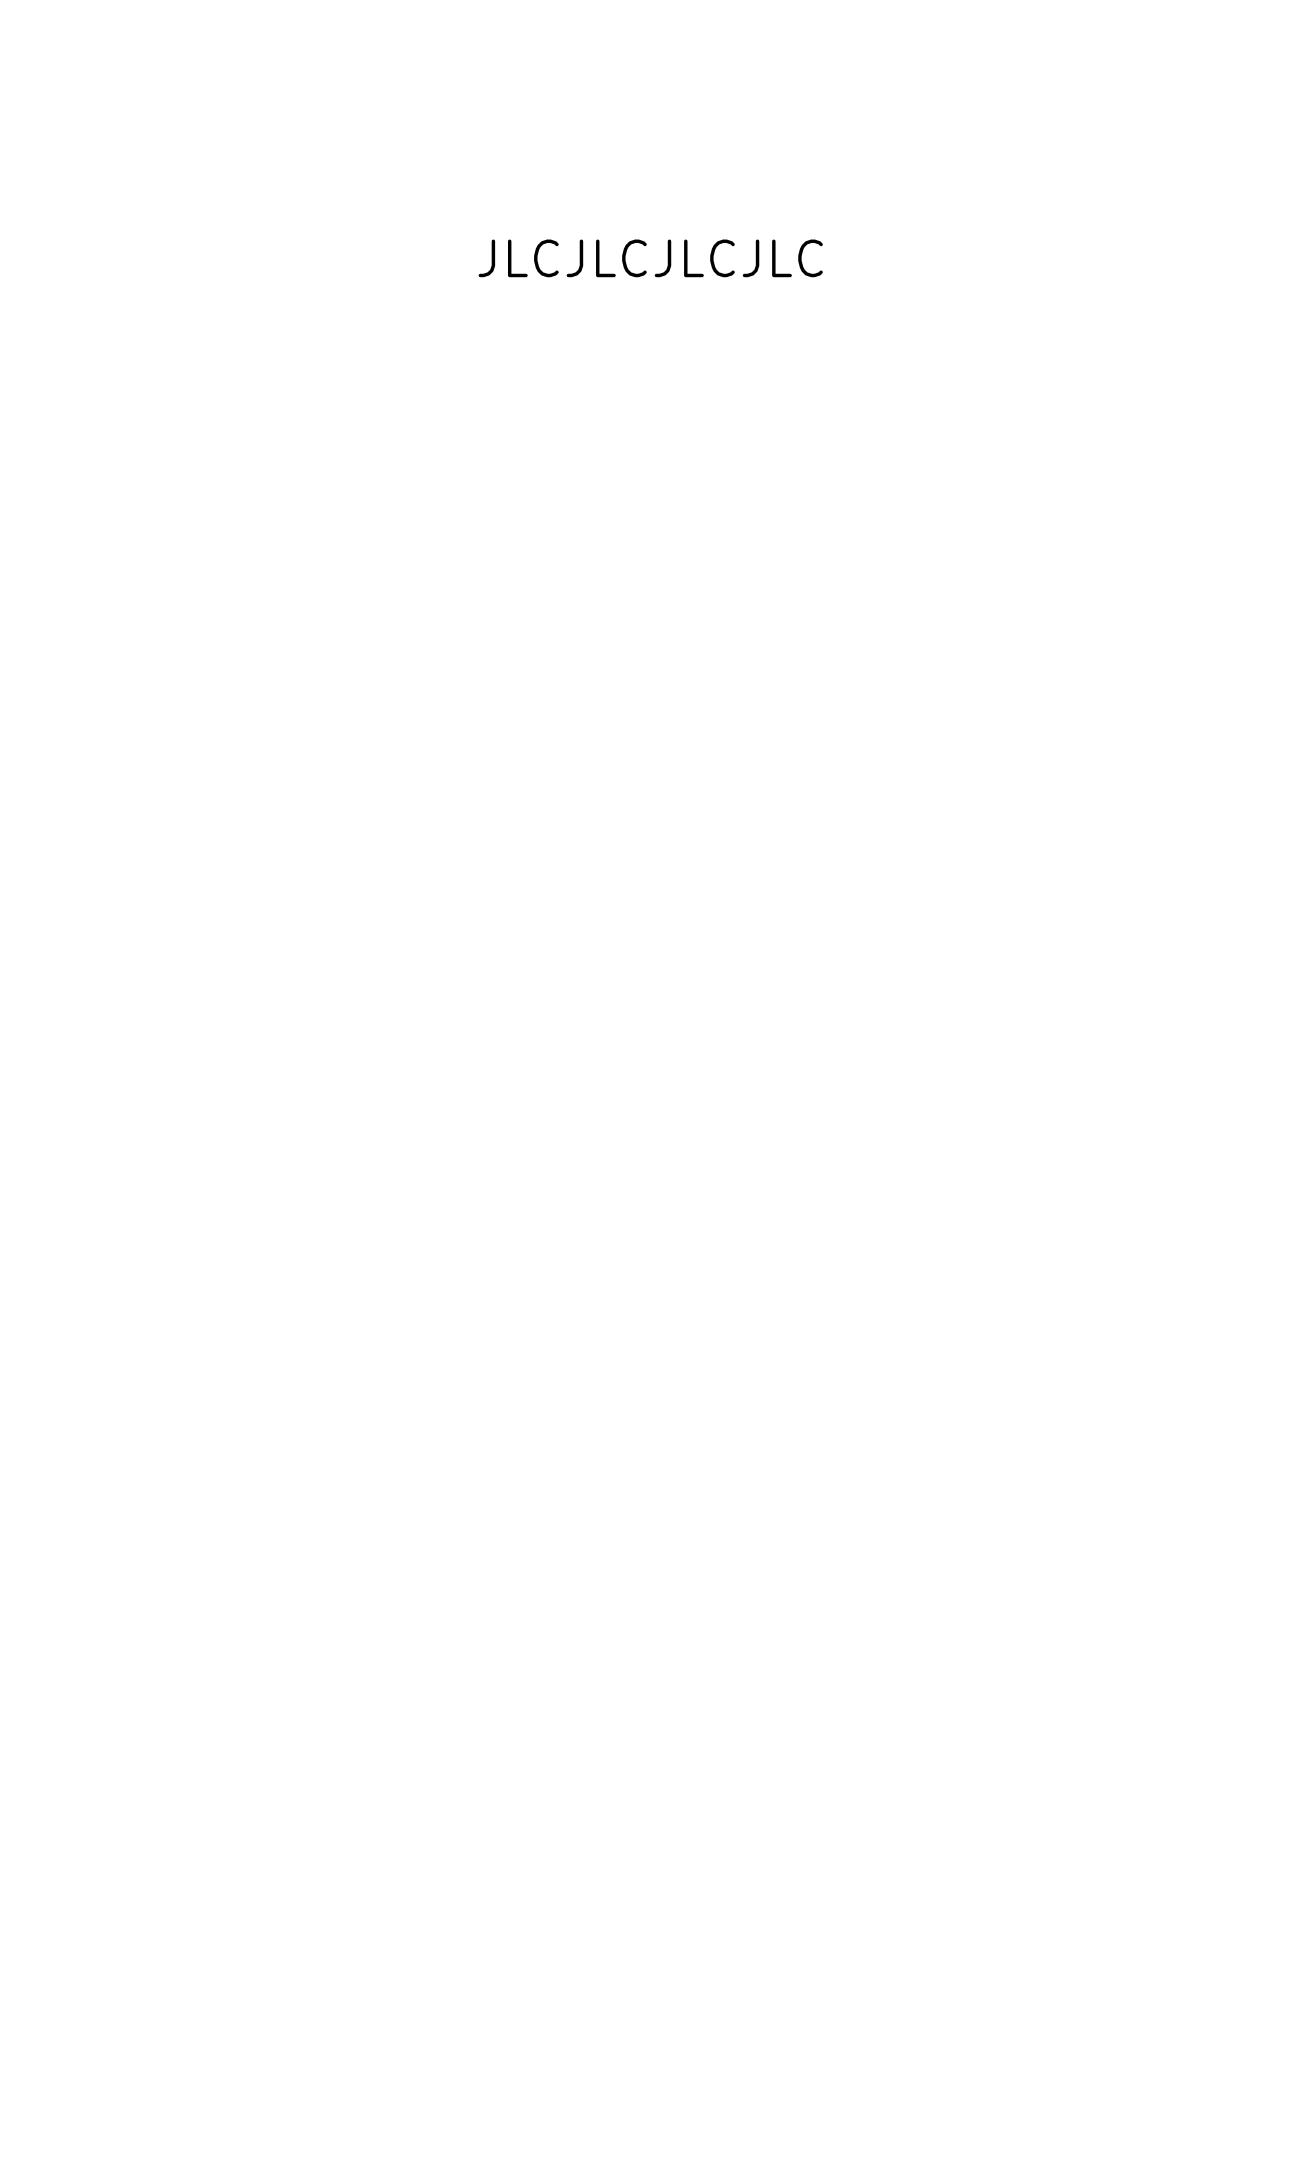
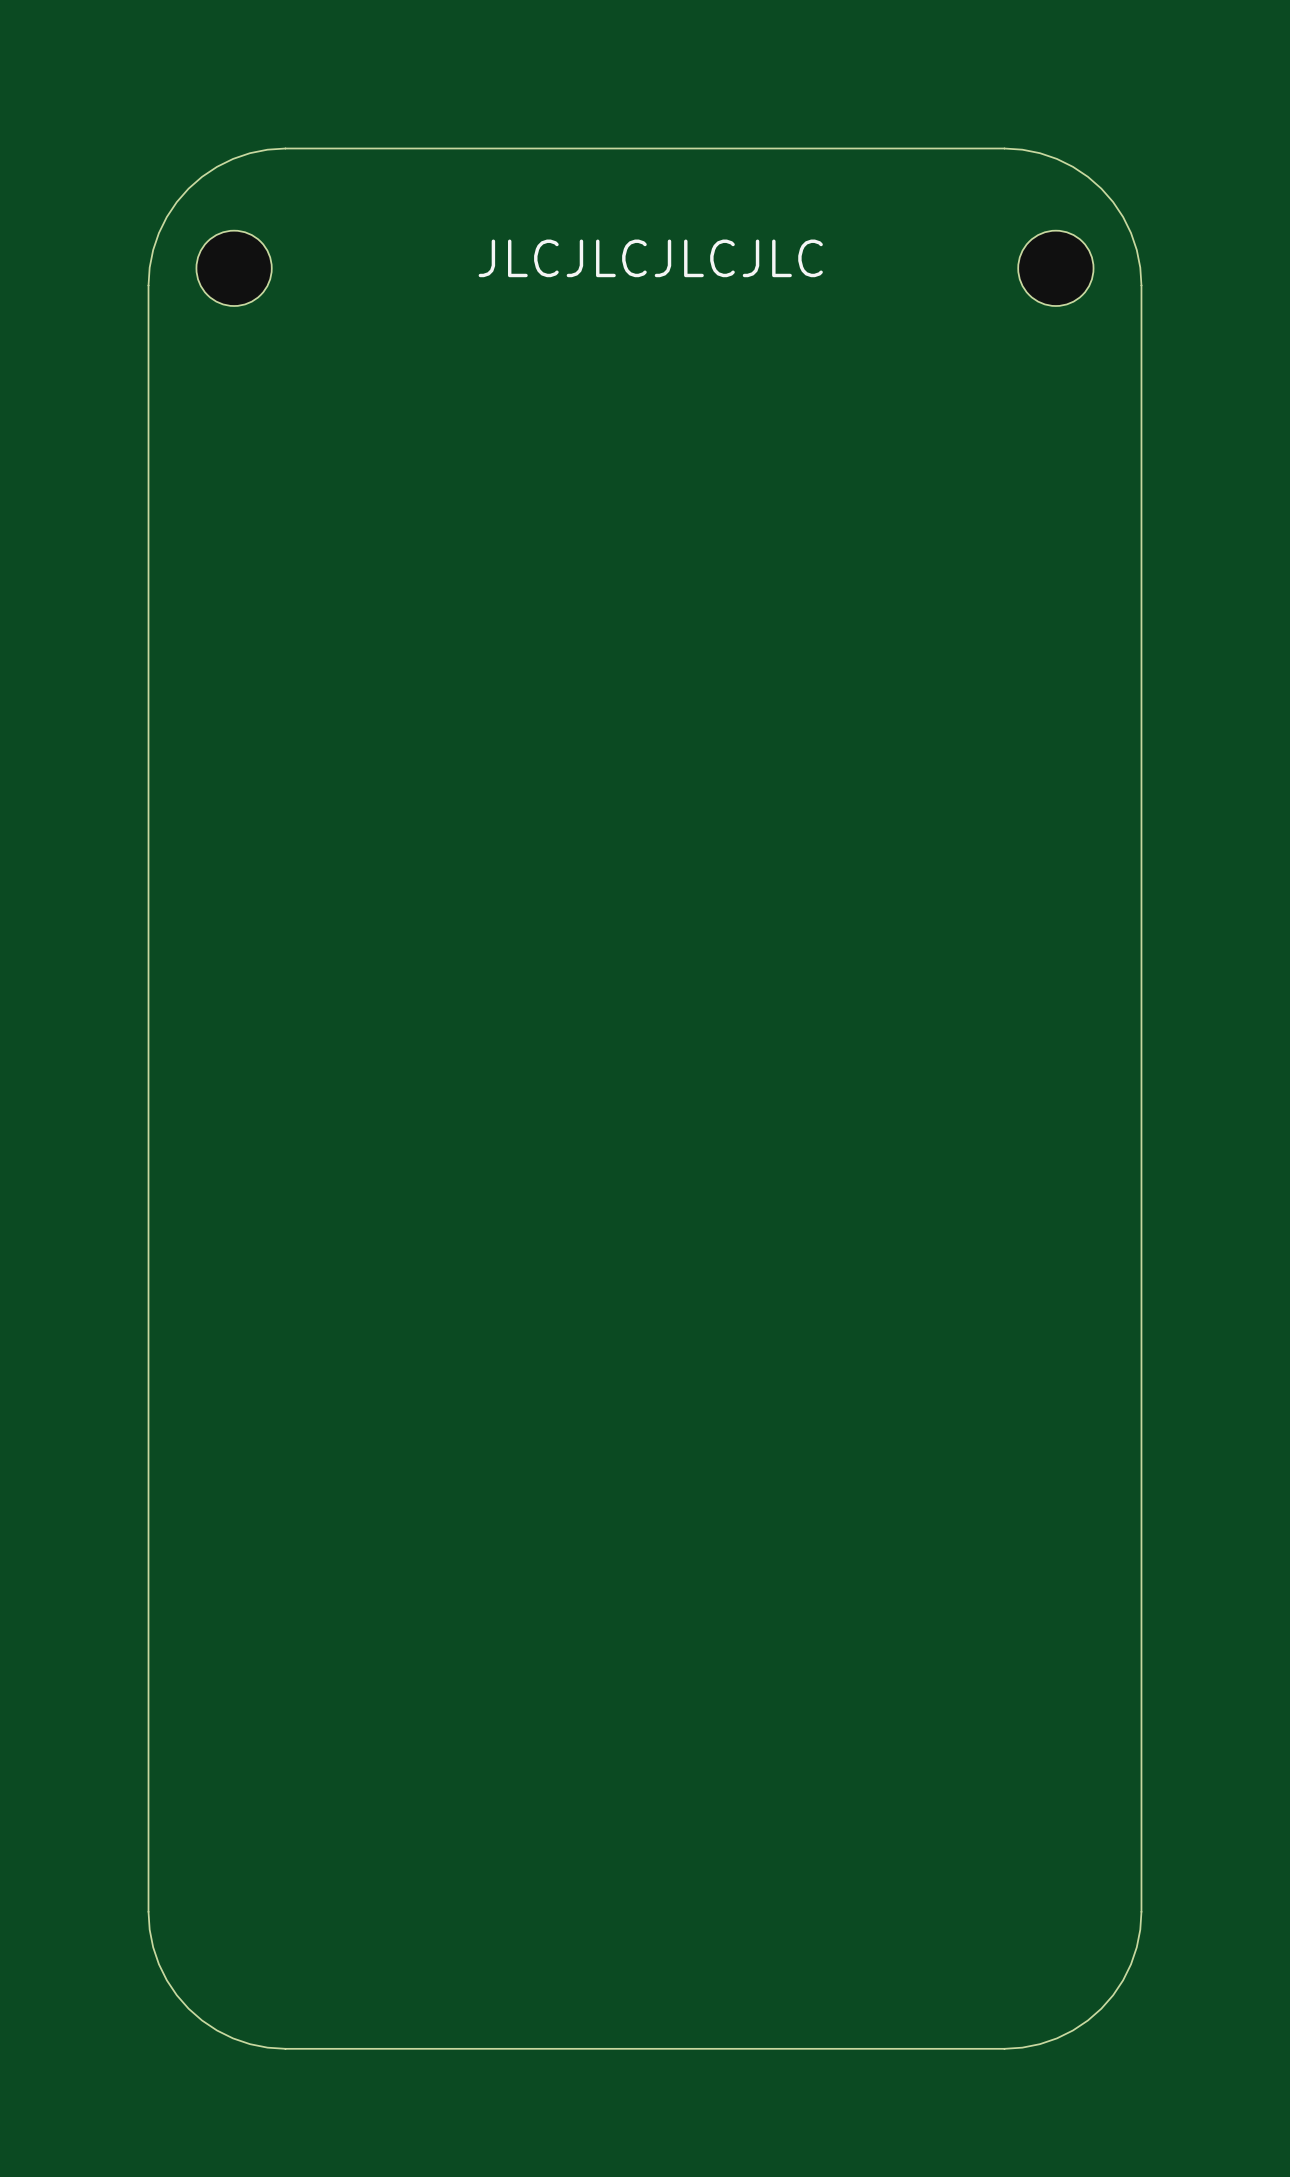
board edge: none -> (285, 148) (1022, 149) (1056, 158) (1087, 176) (1113, 202) (1131, 233) (1140, 267) (1141, 285) (1141, 1911) (1136, 1947) (1123, 1980) (1101, 2008) (1072, 2030) (1056, 2038) (1039, 2044) (1004, 2048) (267, 2047) (233, 2038) (202, 2020) (176, 1995) (158, 1964) (149, 1929) (148, 1911) (149, 267) (158, 233) (176, 202) (188, 188) (216, 166) (233, 158) (250, 153) (285, 148)
part: none -> (234, 268)
part: none -> (1055, 268)

